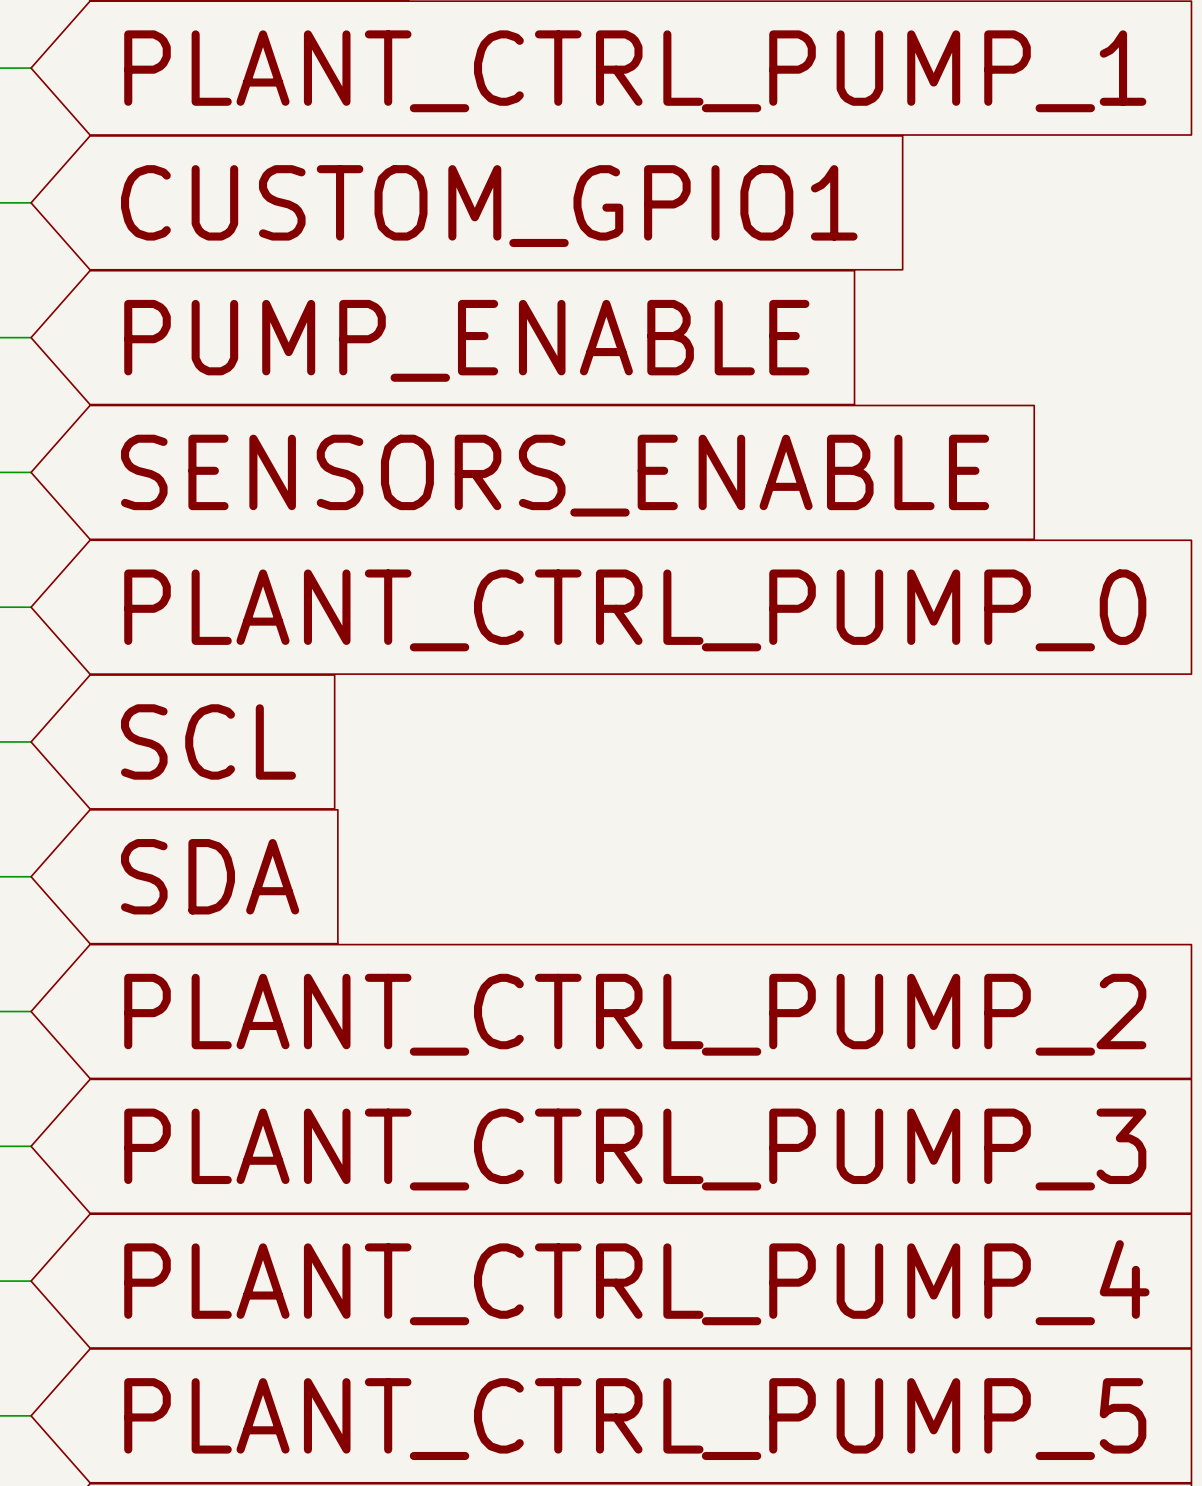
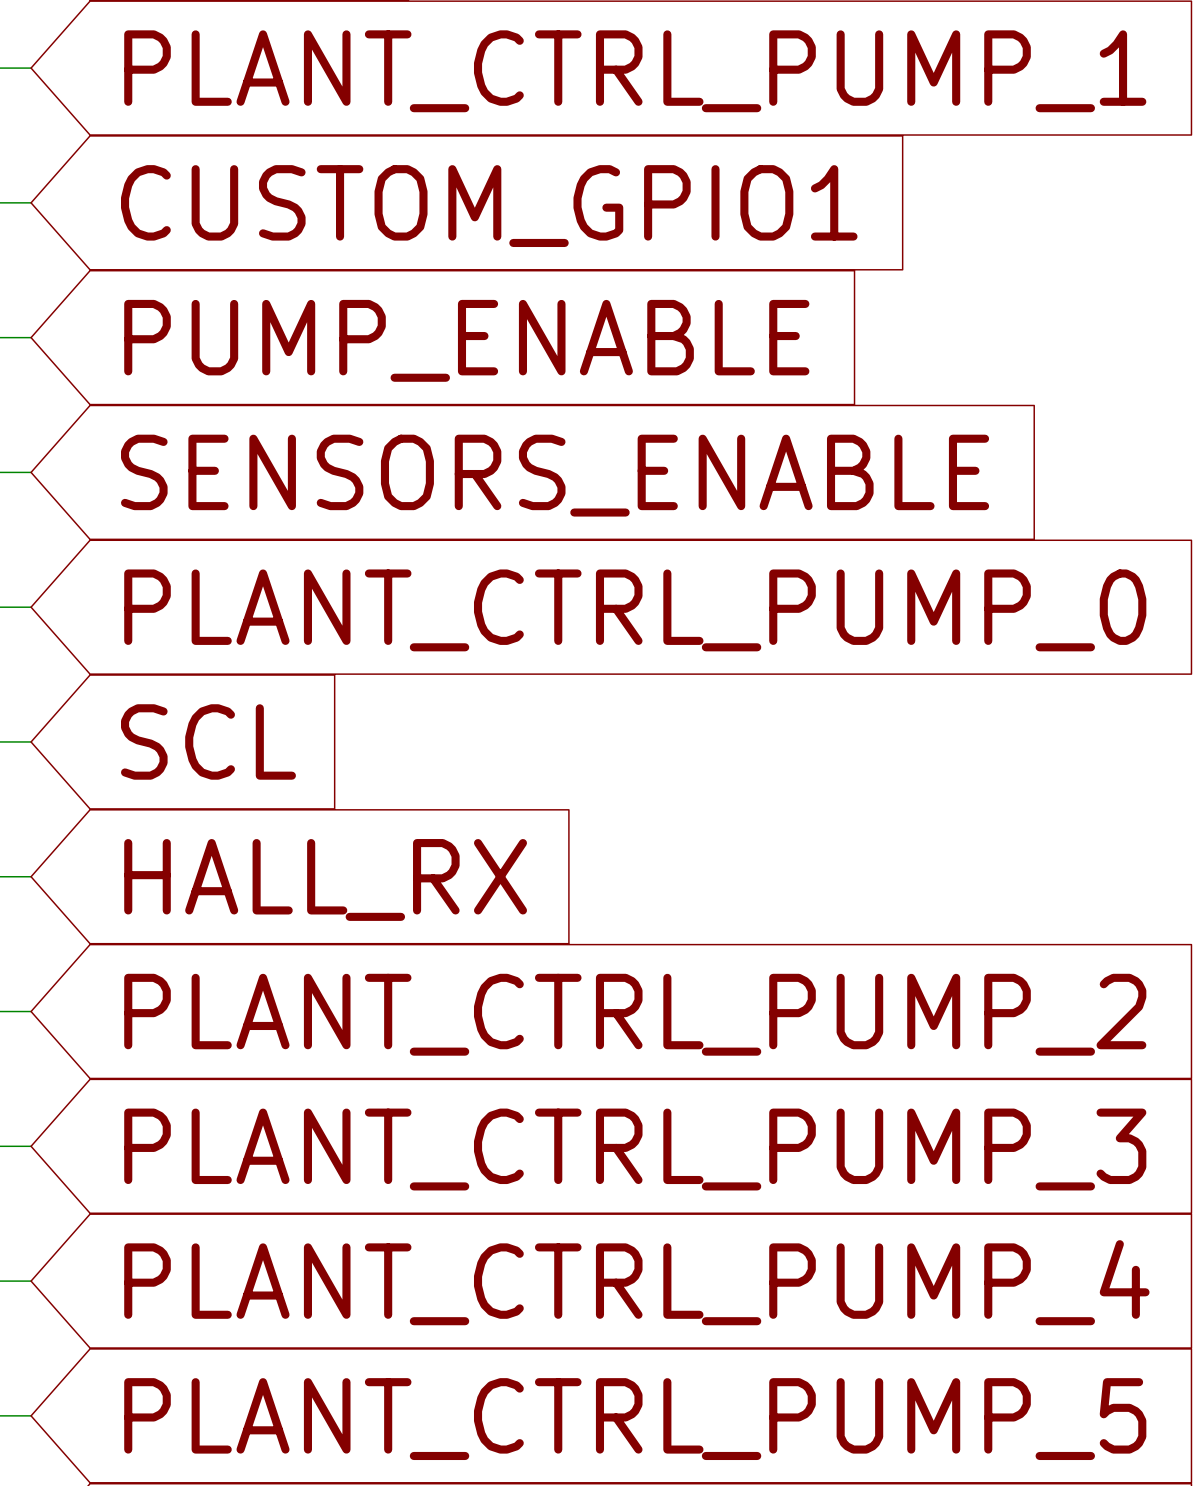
global label: SDA (210, 876) -> HALL_RX (325, 879)

